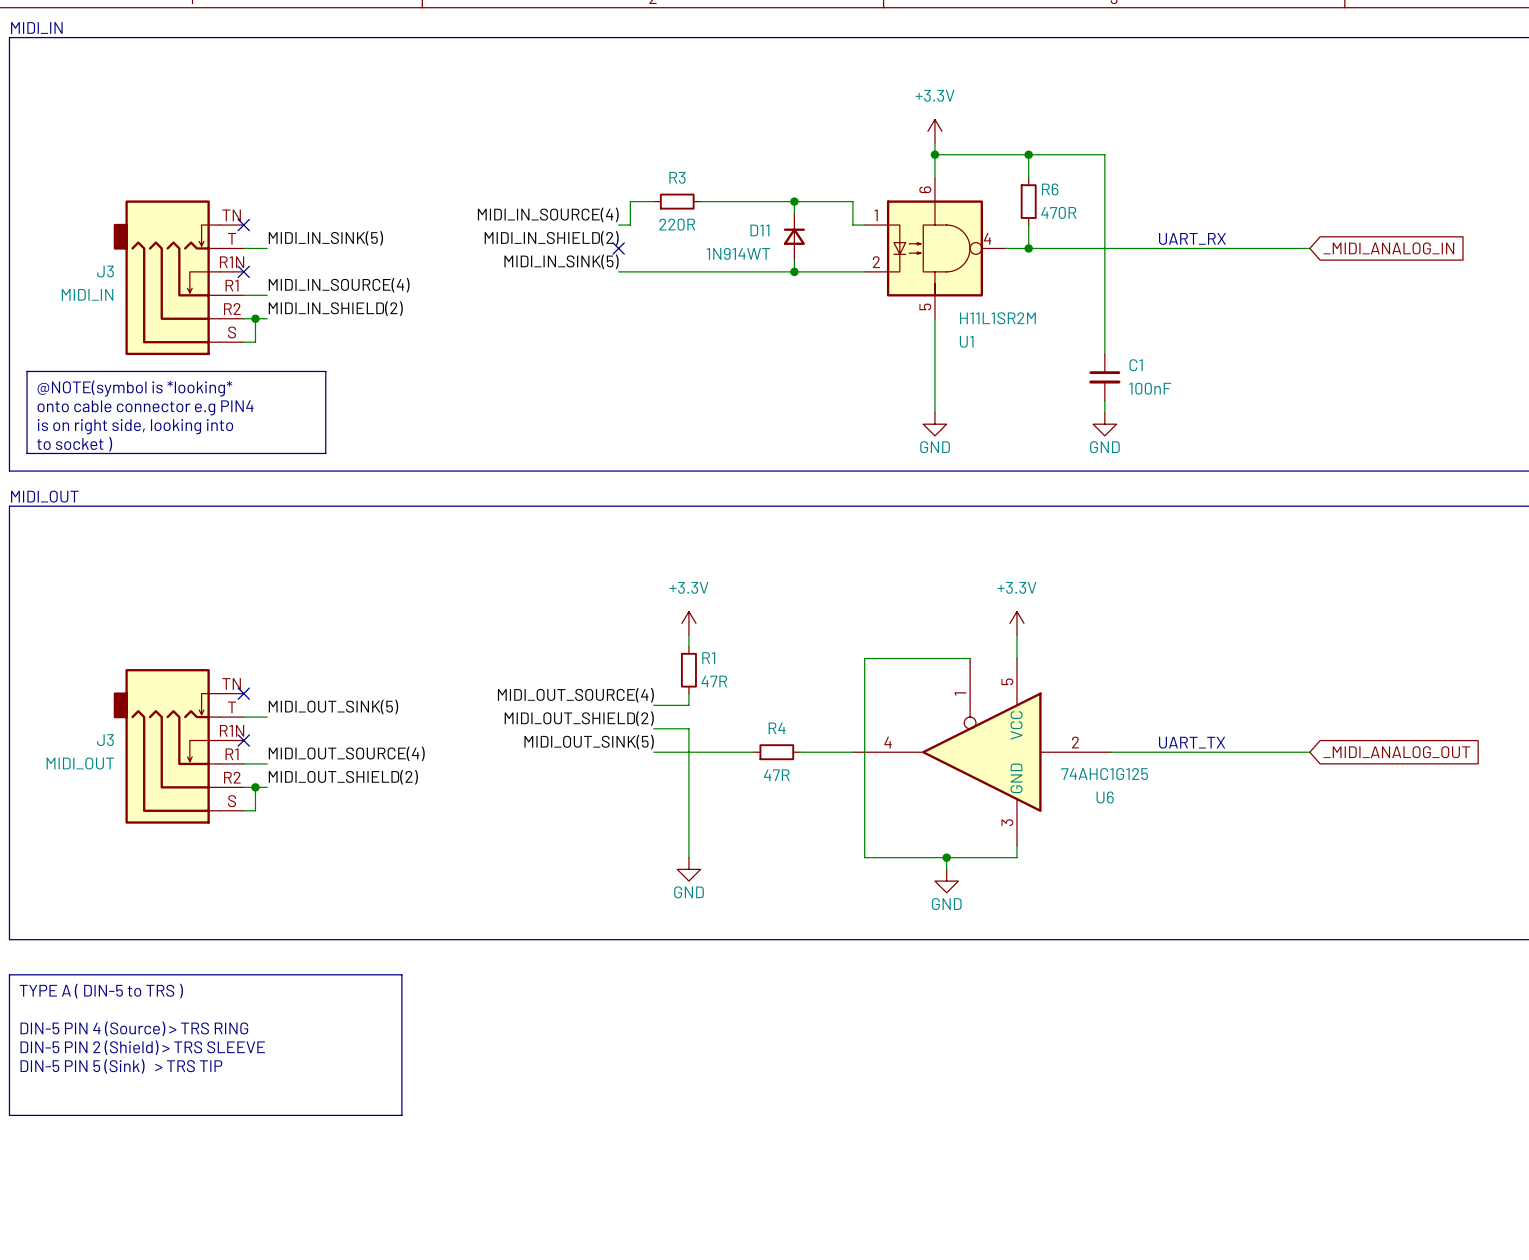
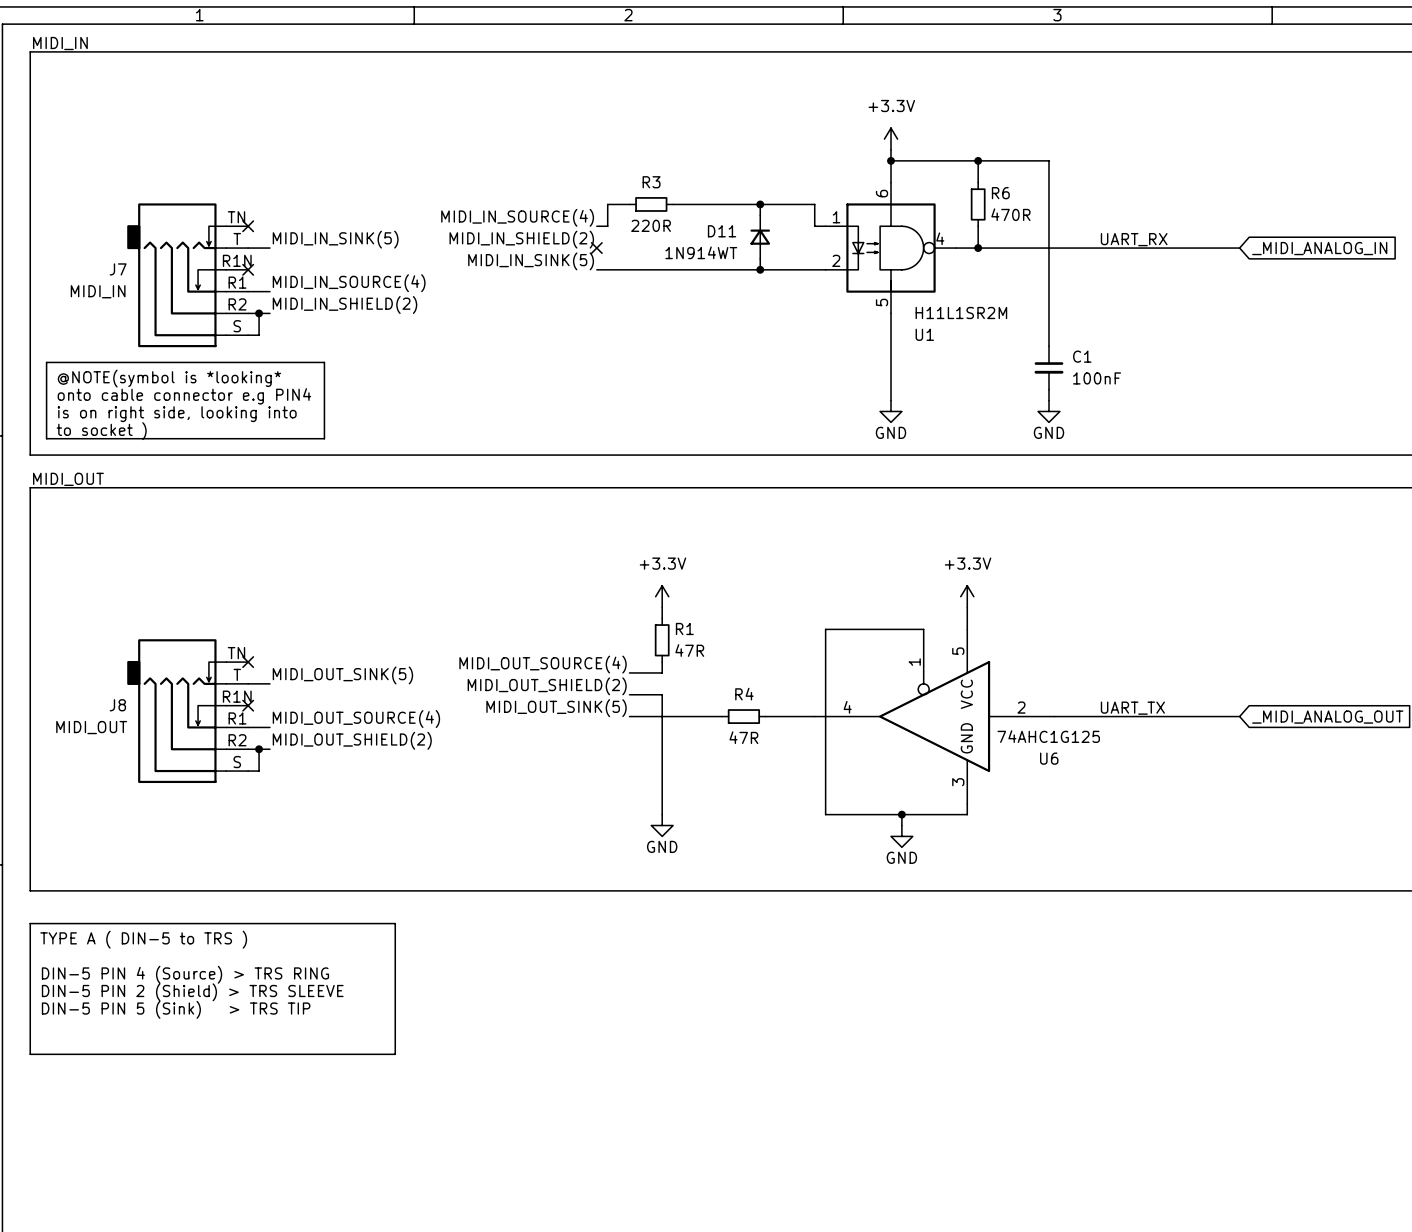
J3 name: J3 (105, 271) -> J7 (118, 269)
J3 name: J3 (105, 740) -> J8 (117, 705)

